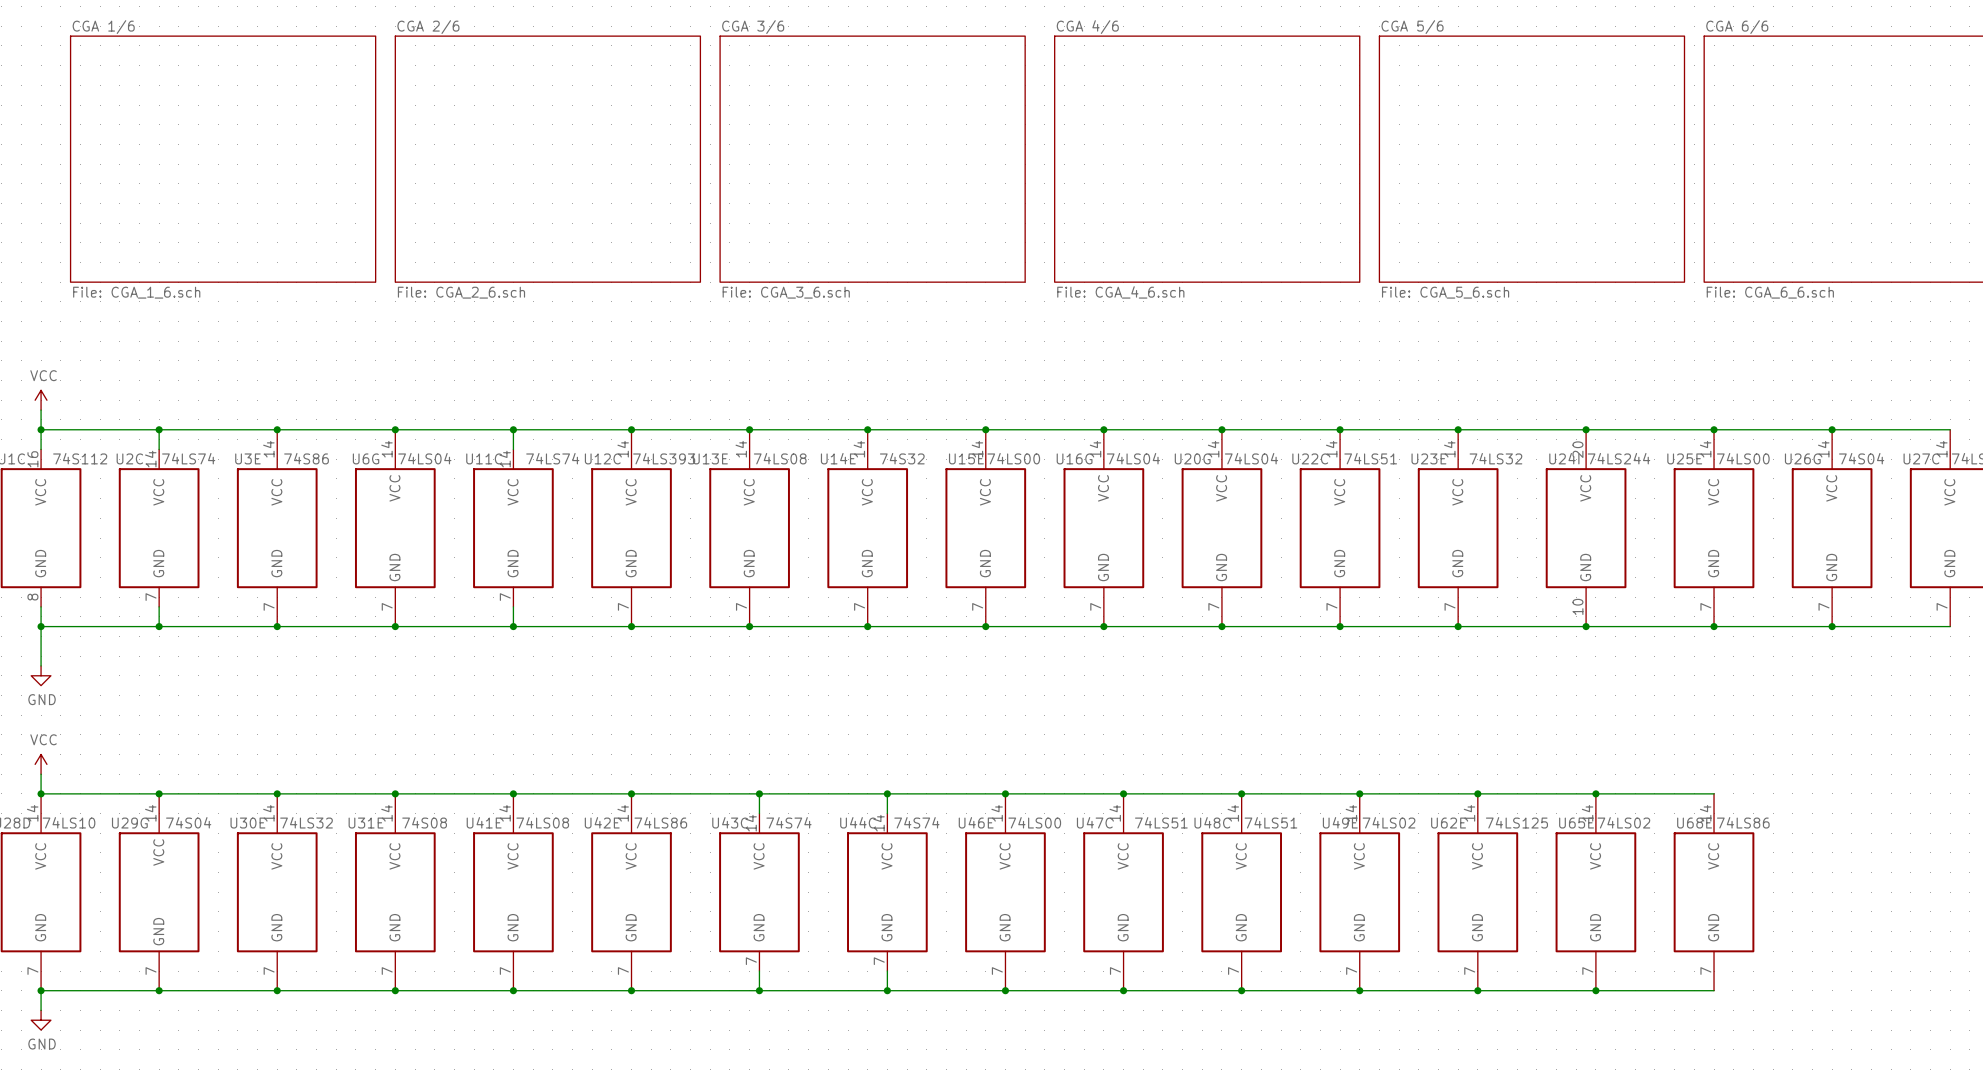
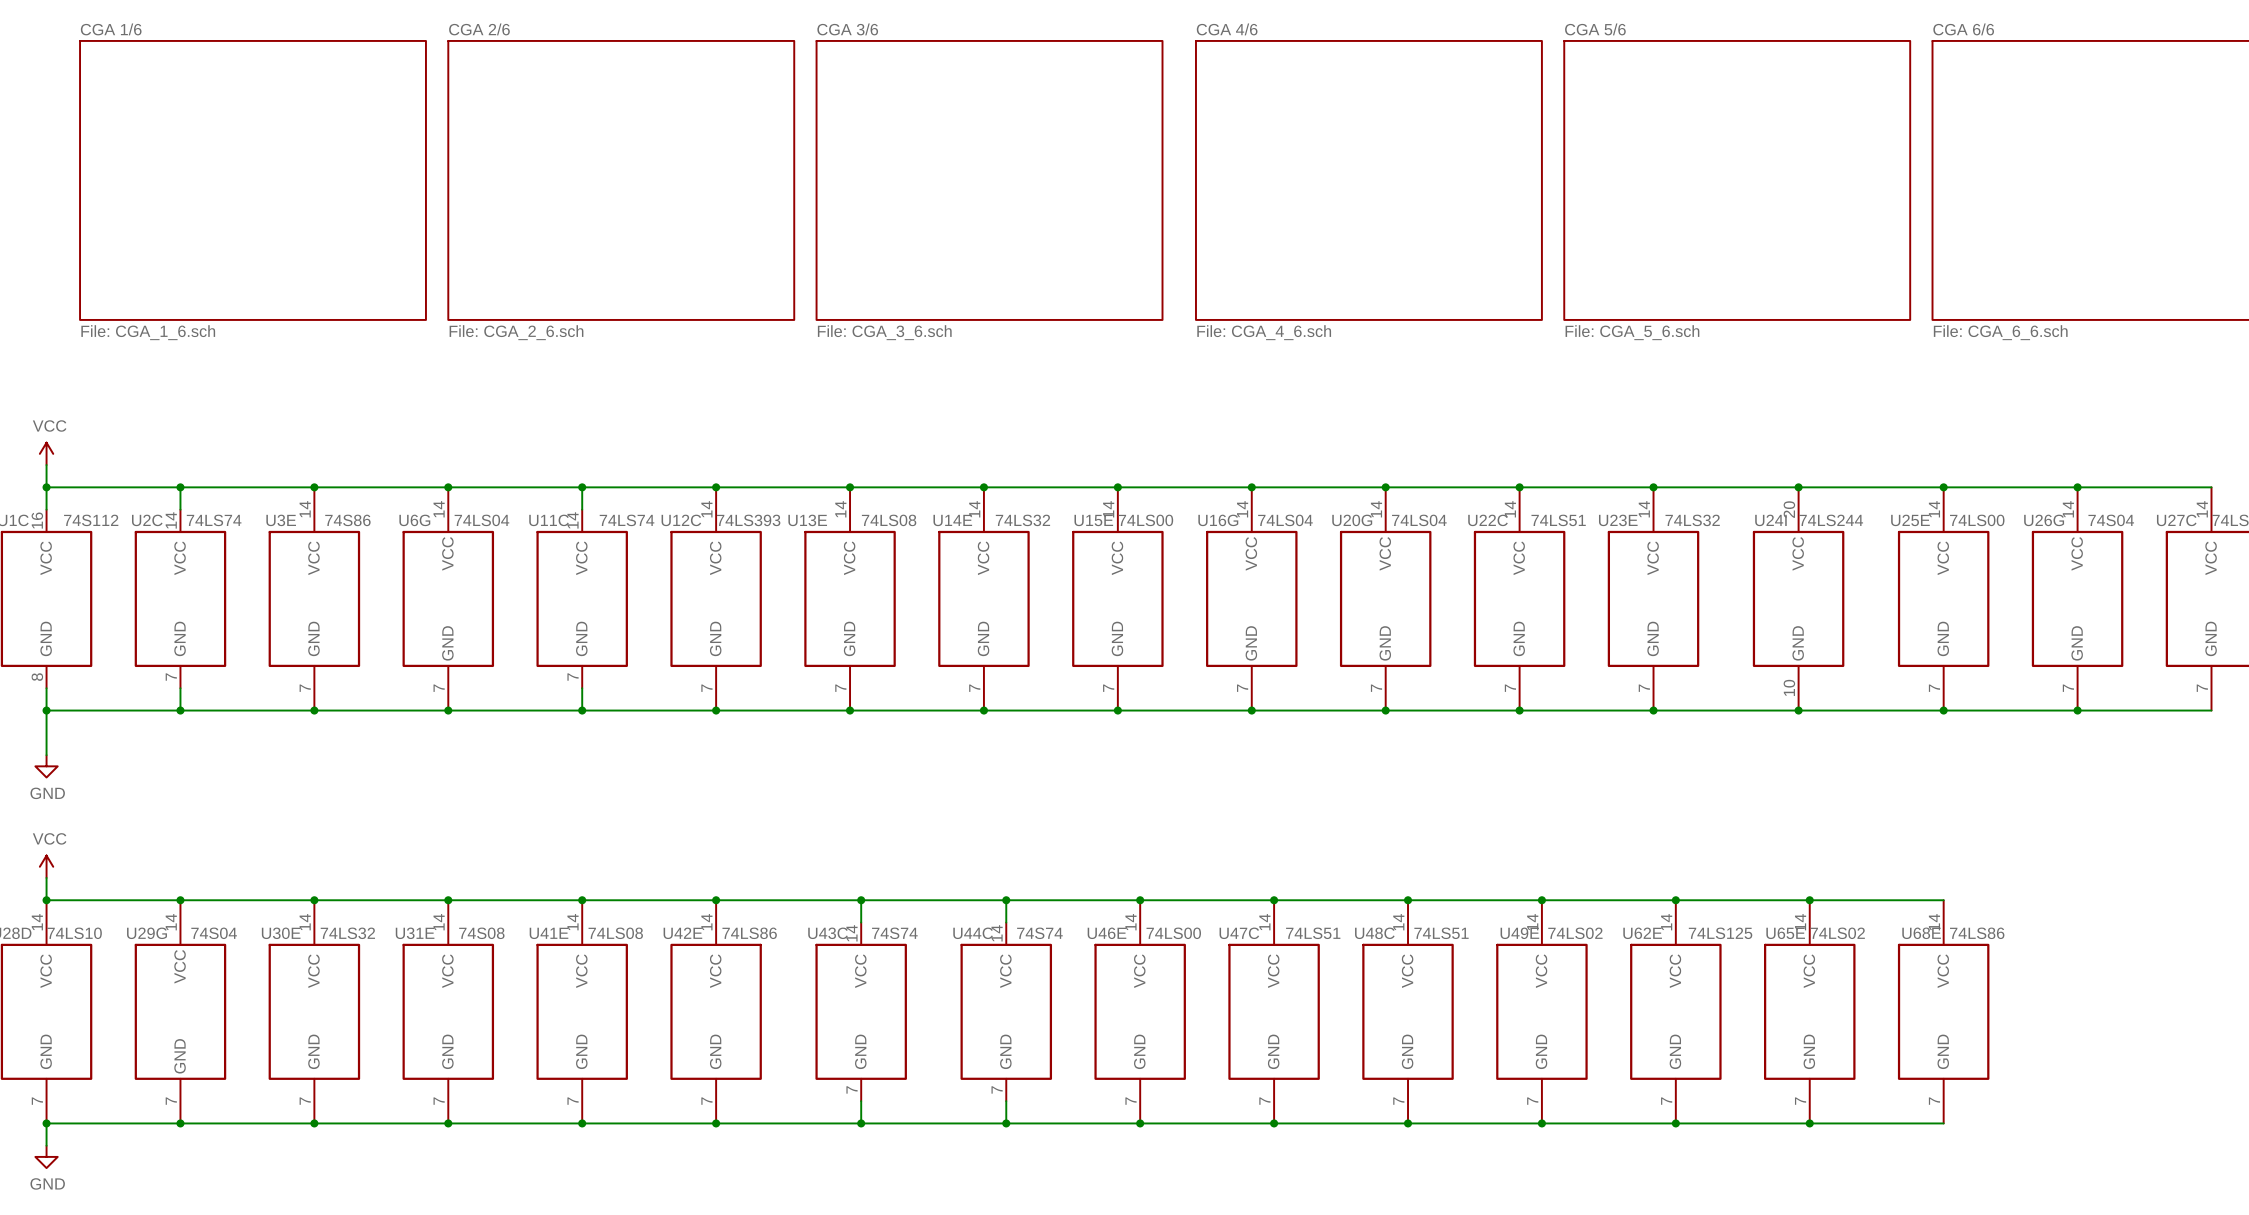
U14E value: 74S32 (902, 458) -> 74LS32 (1022, 520)

